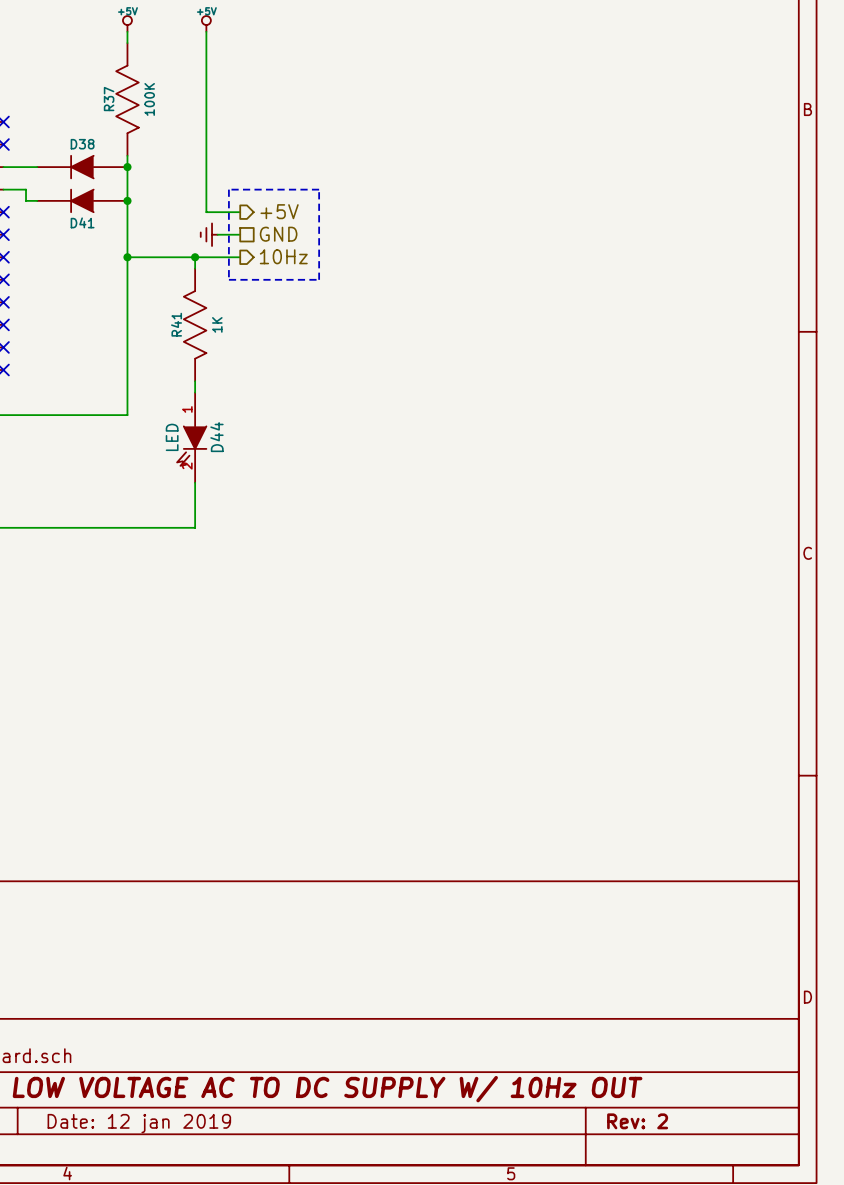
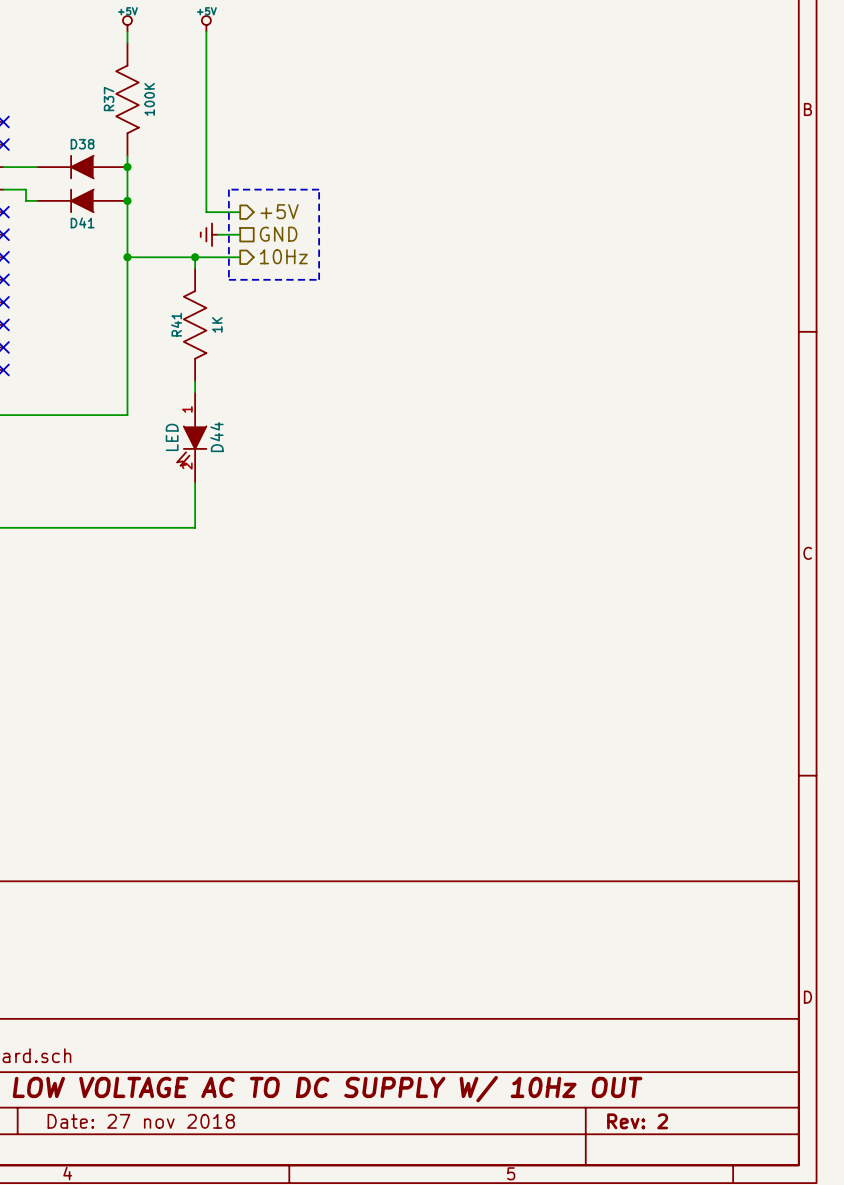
title block: Date: 12 jan 2019 (139, 1123) -> Date: 27 nov 2018 (141, 1121)

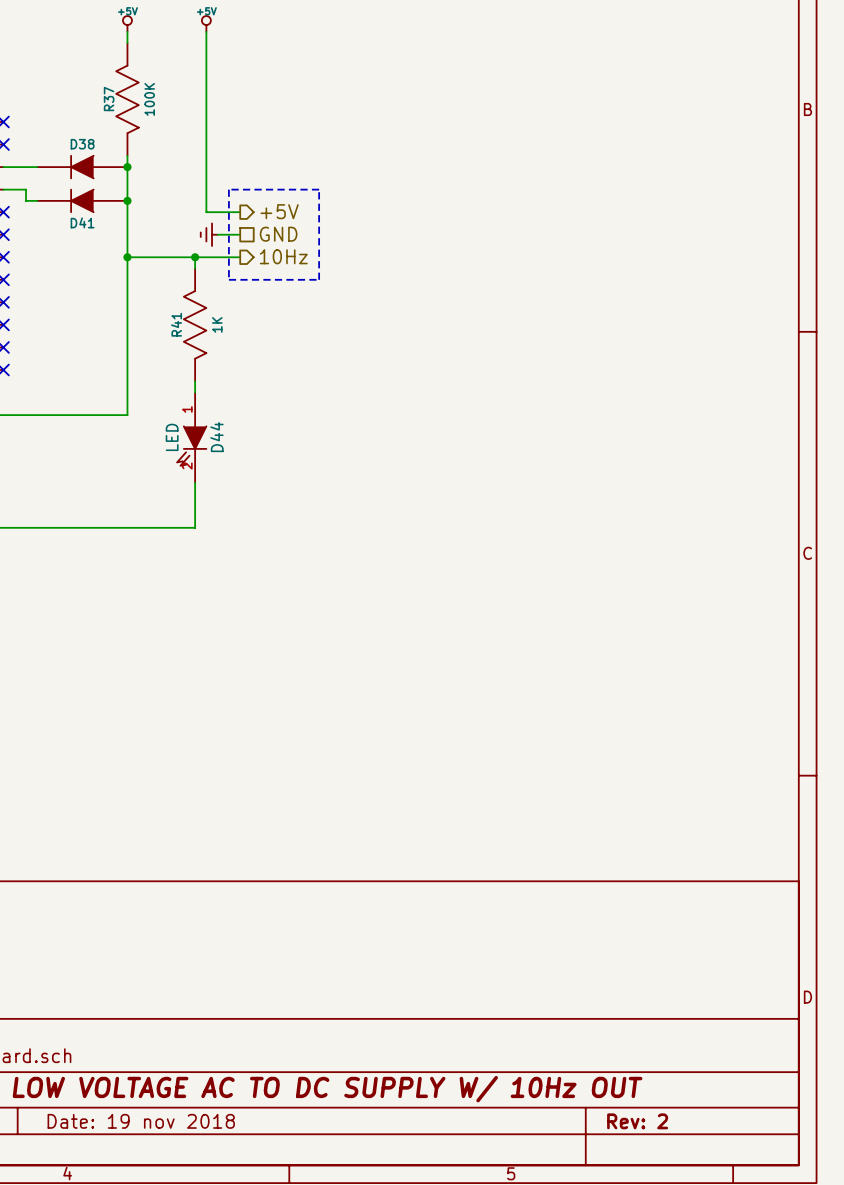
title block: Date: 27 nov 2018 (141, 1121) -> Date: 19 nov 2018 (141, 1121)

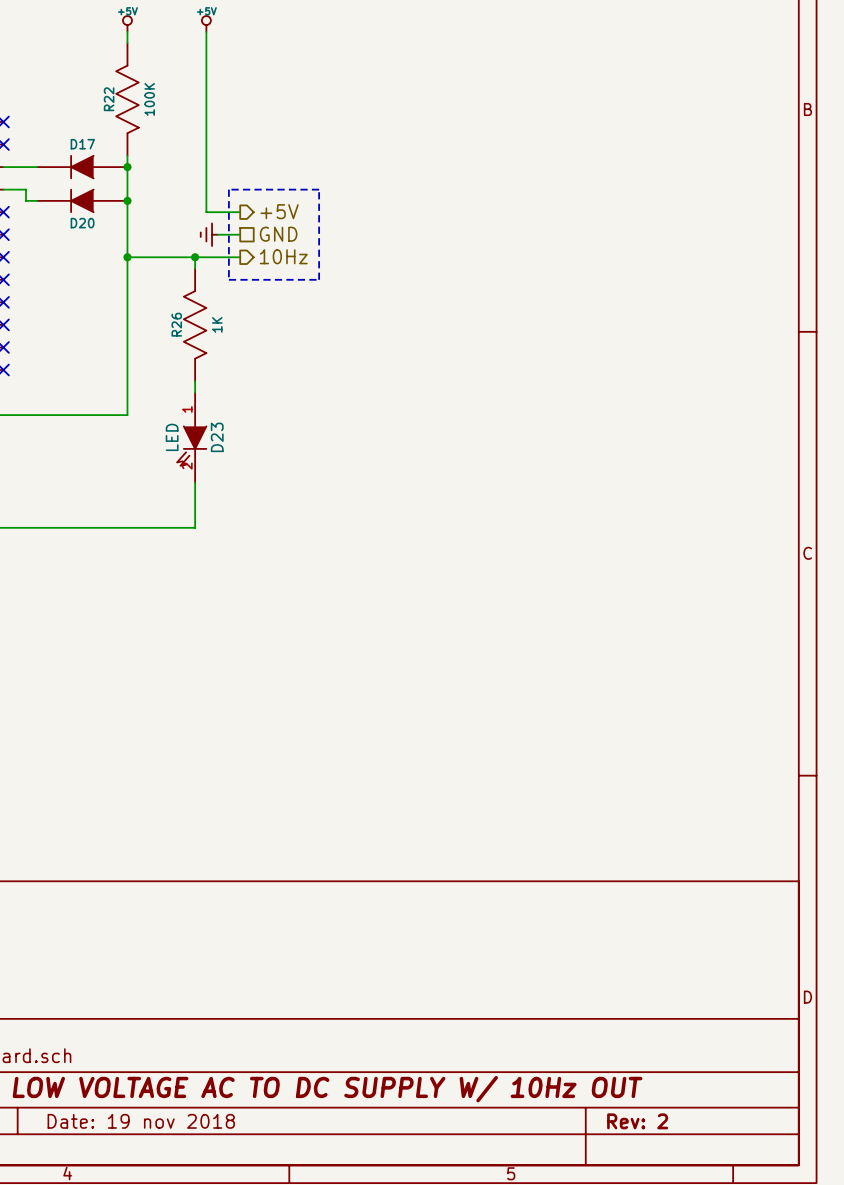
R37 name: R37 (109, 99) -> R22 (109, 99)
D38 name: D38 (82, 144) -> D17 (82, 144)
D41 name: D41 (82, 222) -> D20 (82, 223)
R41 name: R41 (176, 324) -> R26 (176, 324)
D44 name: D44 (216, 437) -> D23 (217, 437)

